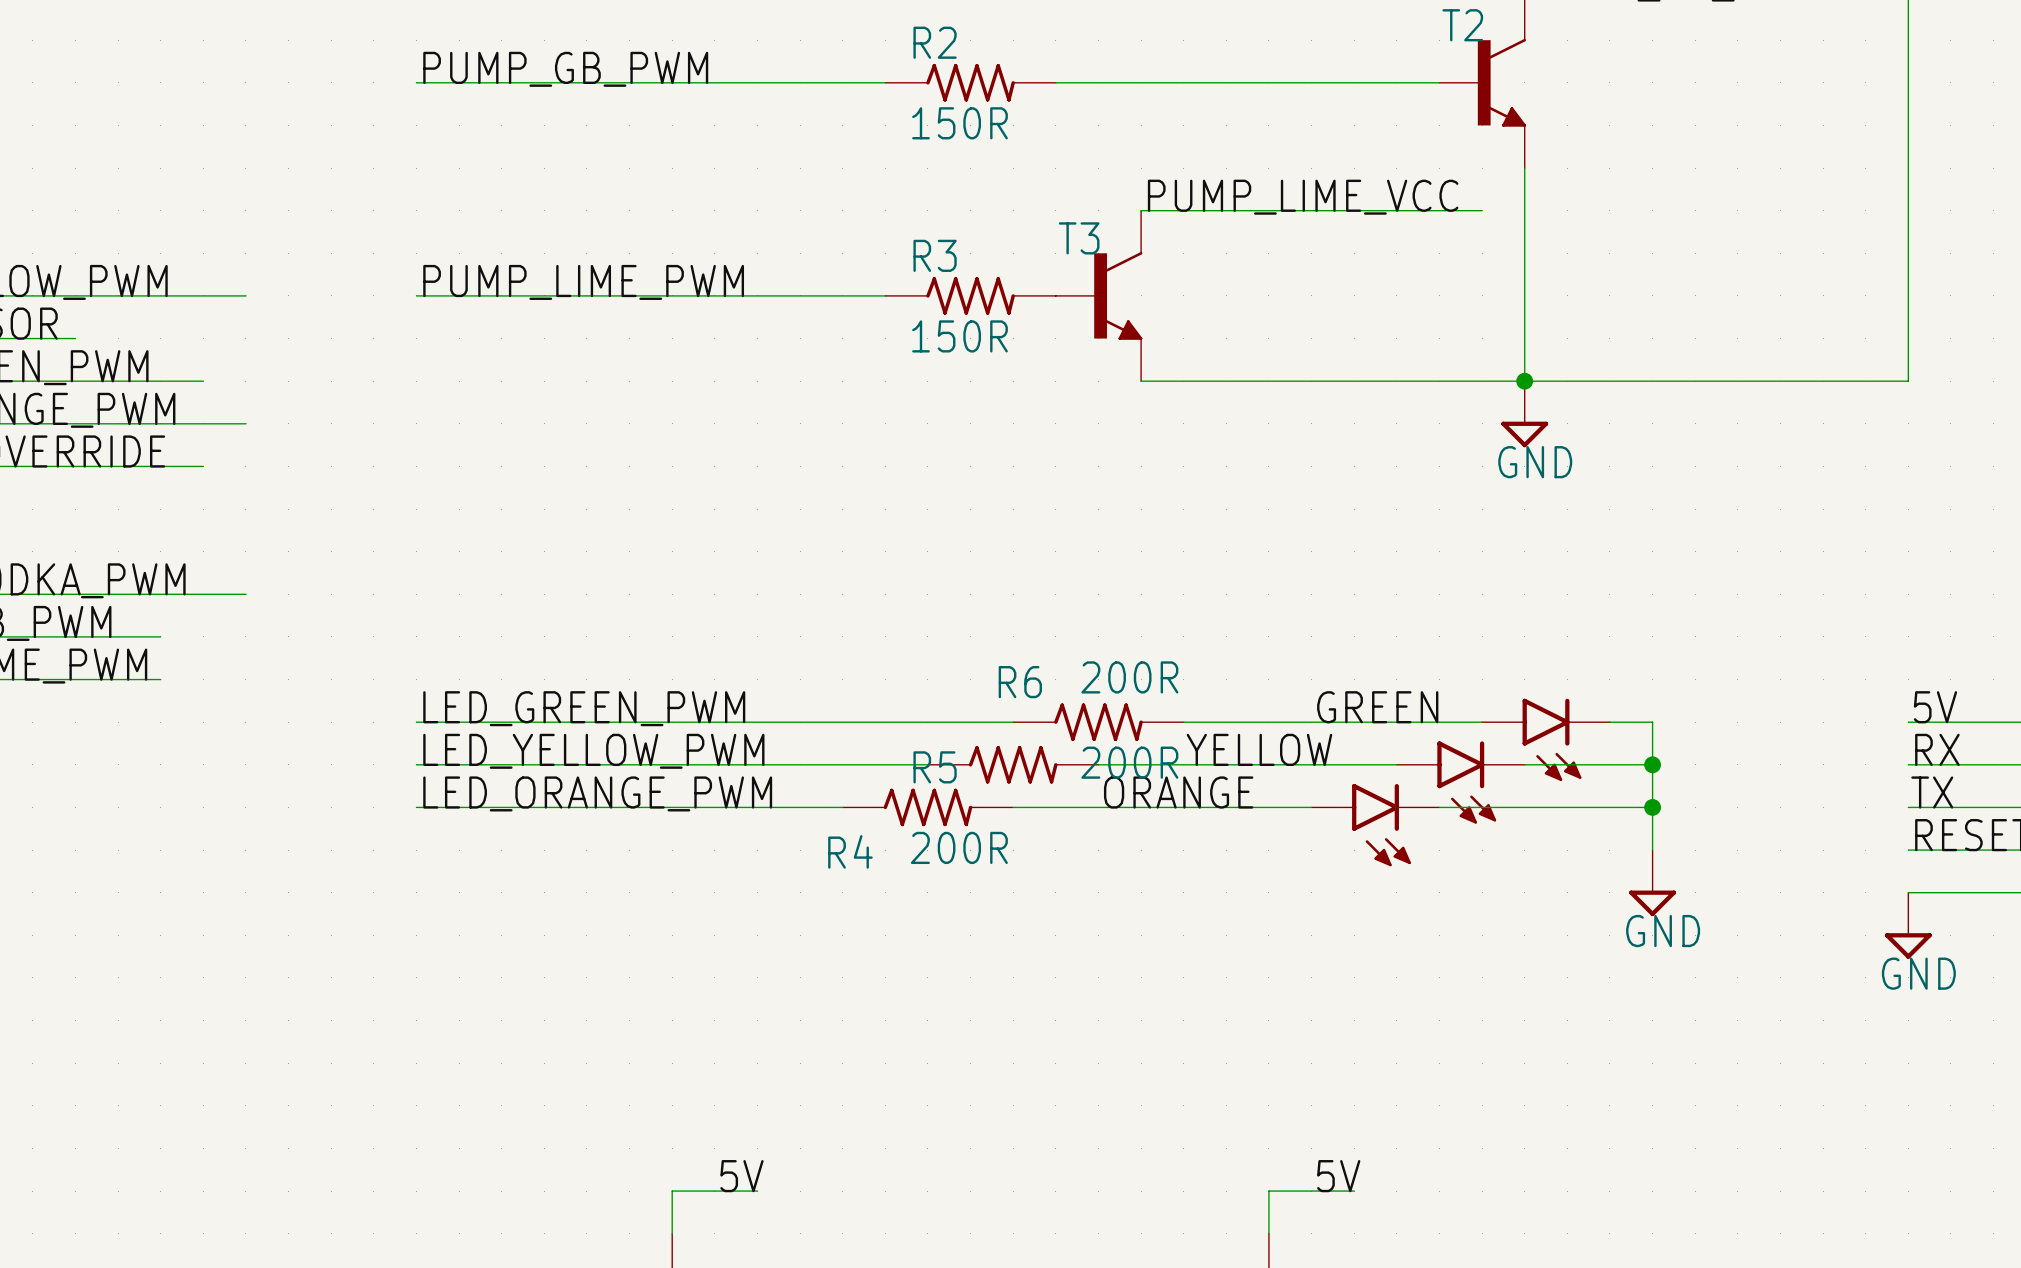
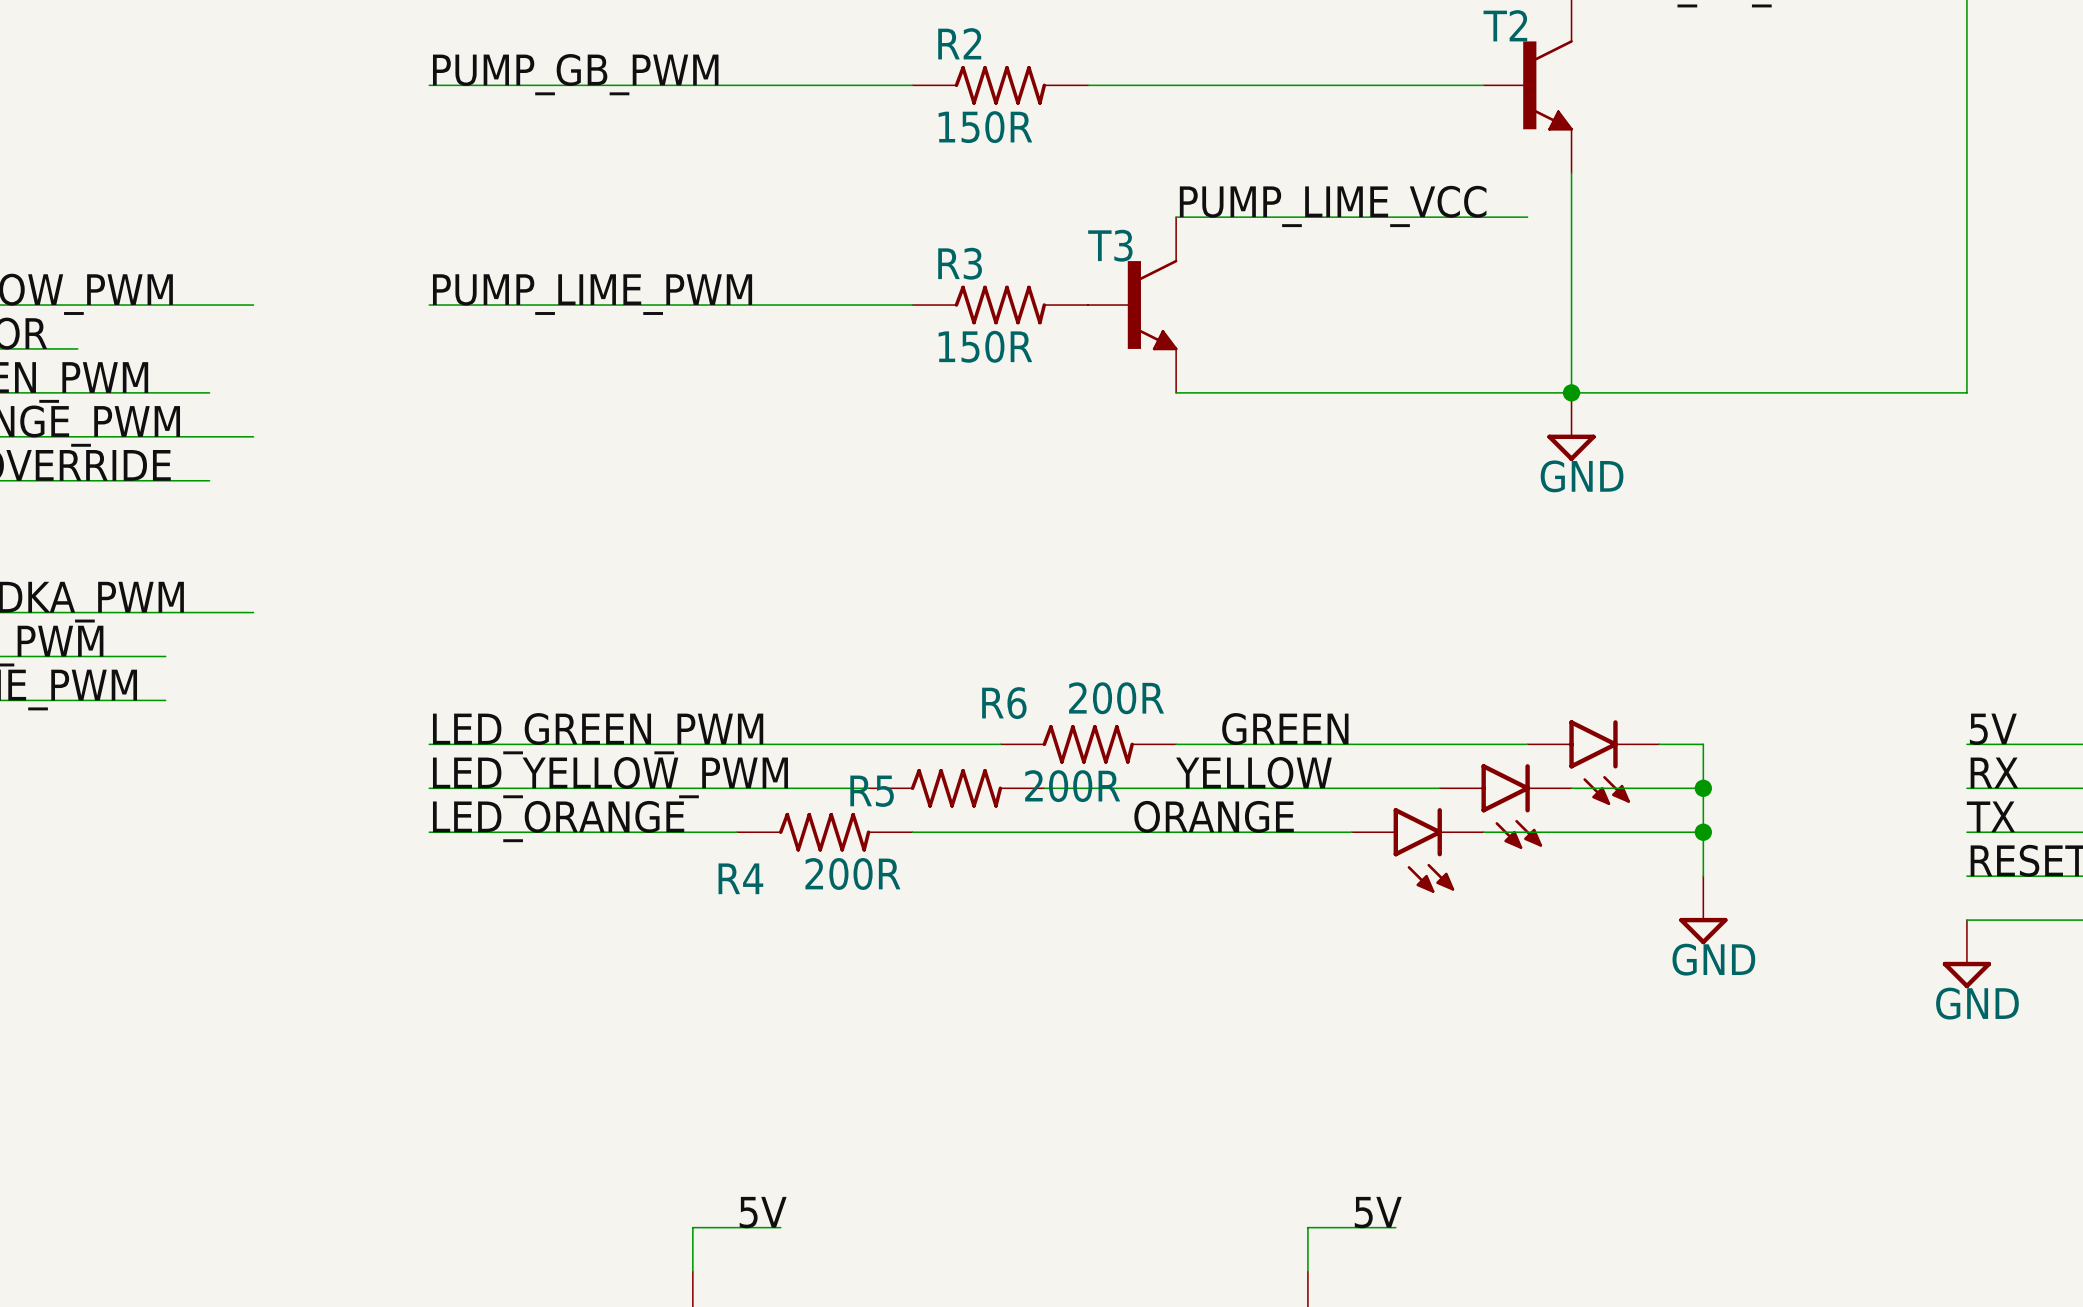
label position: GREEN (1377, 707) -> GREEN (1285, 729)
R6 position: (1098, 722) -> (1088, 744)
label position: YELLOW (1259, 749) -> YELLOW (1253, 772)
R5 position: (1013, 764) -> (956, 788)
label: LED_ORANGE_PWM (597, 793) -> LED_ORANGE (558, 821)
R4 position: (927, 807) -> (824, 832)

